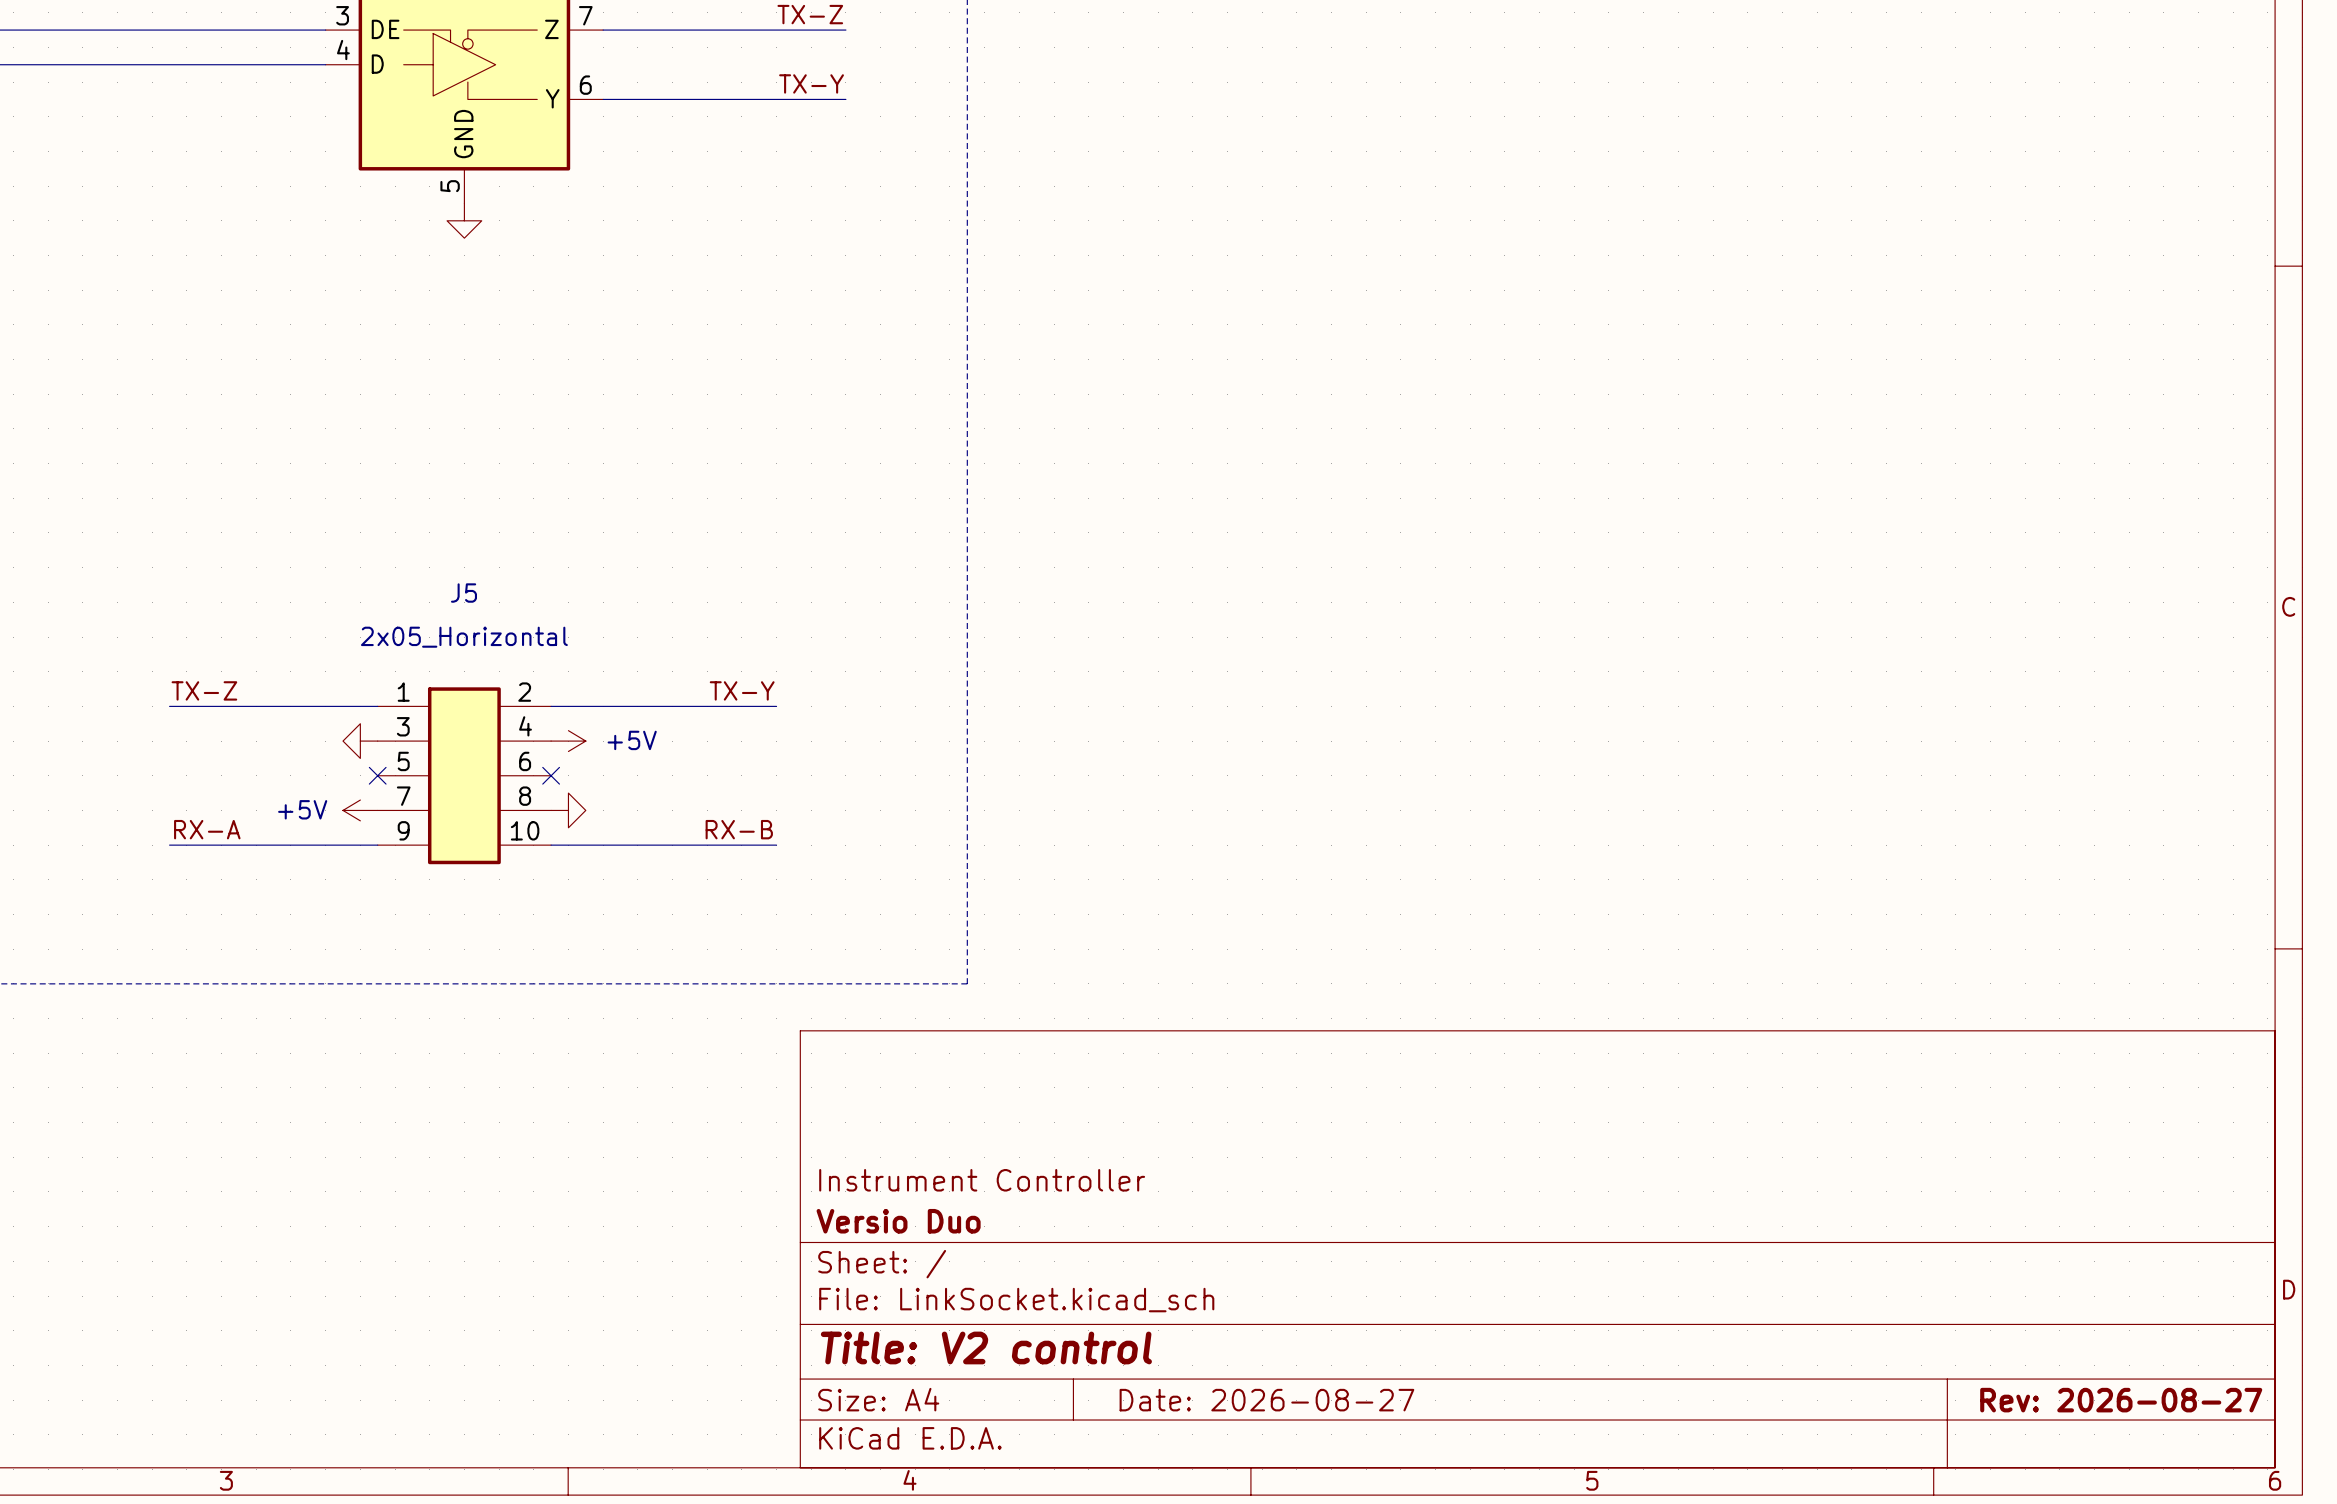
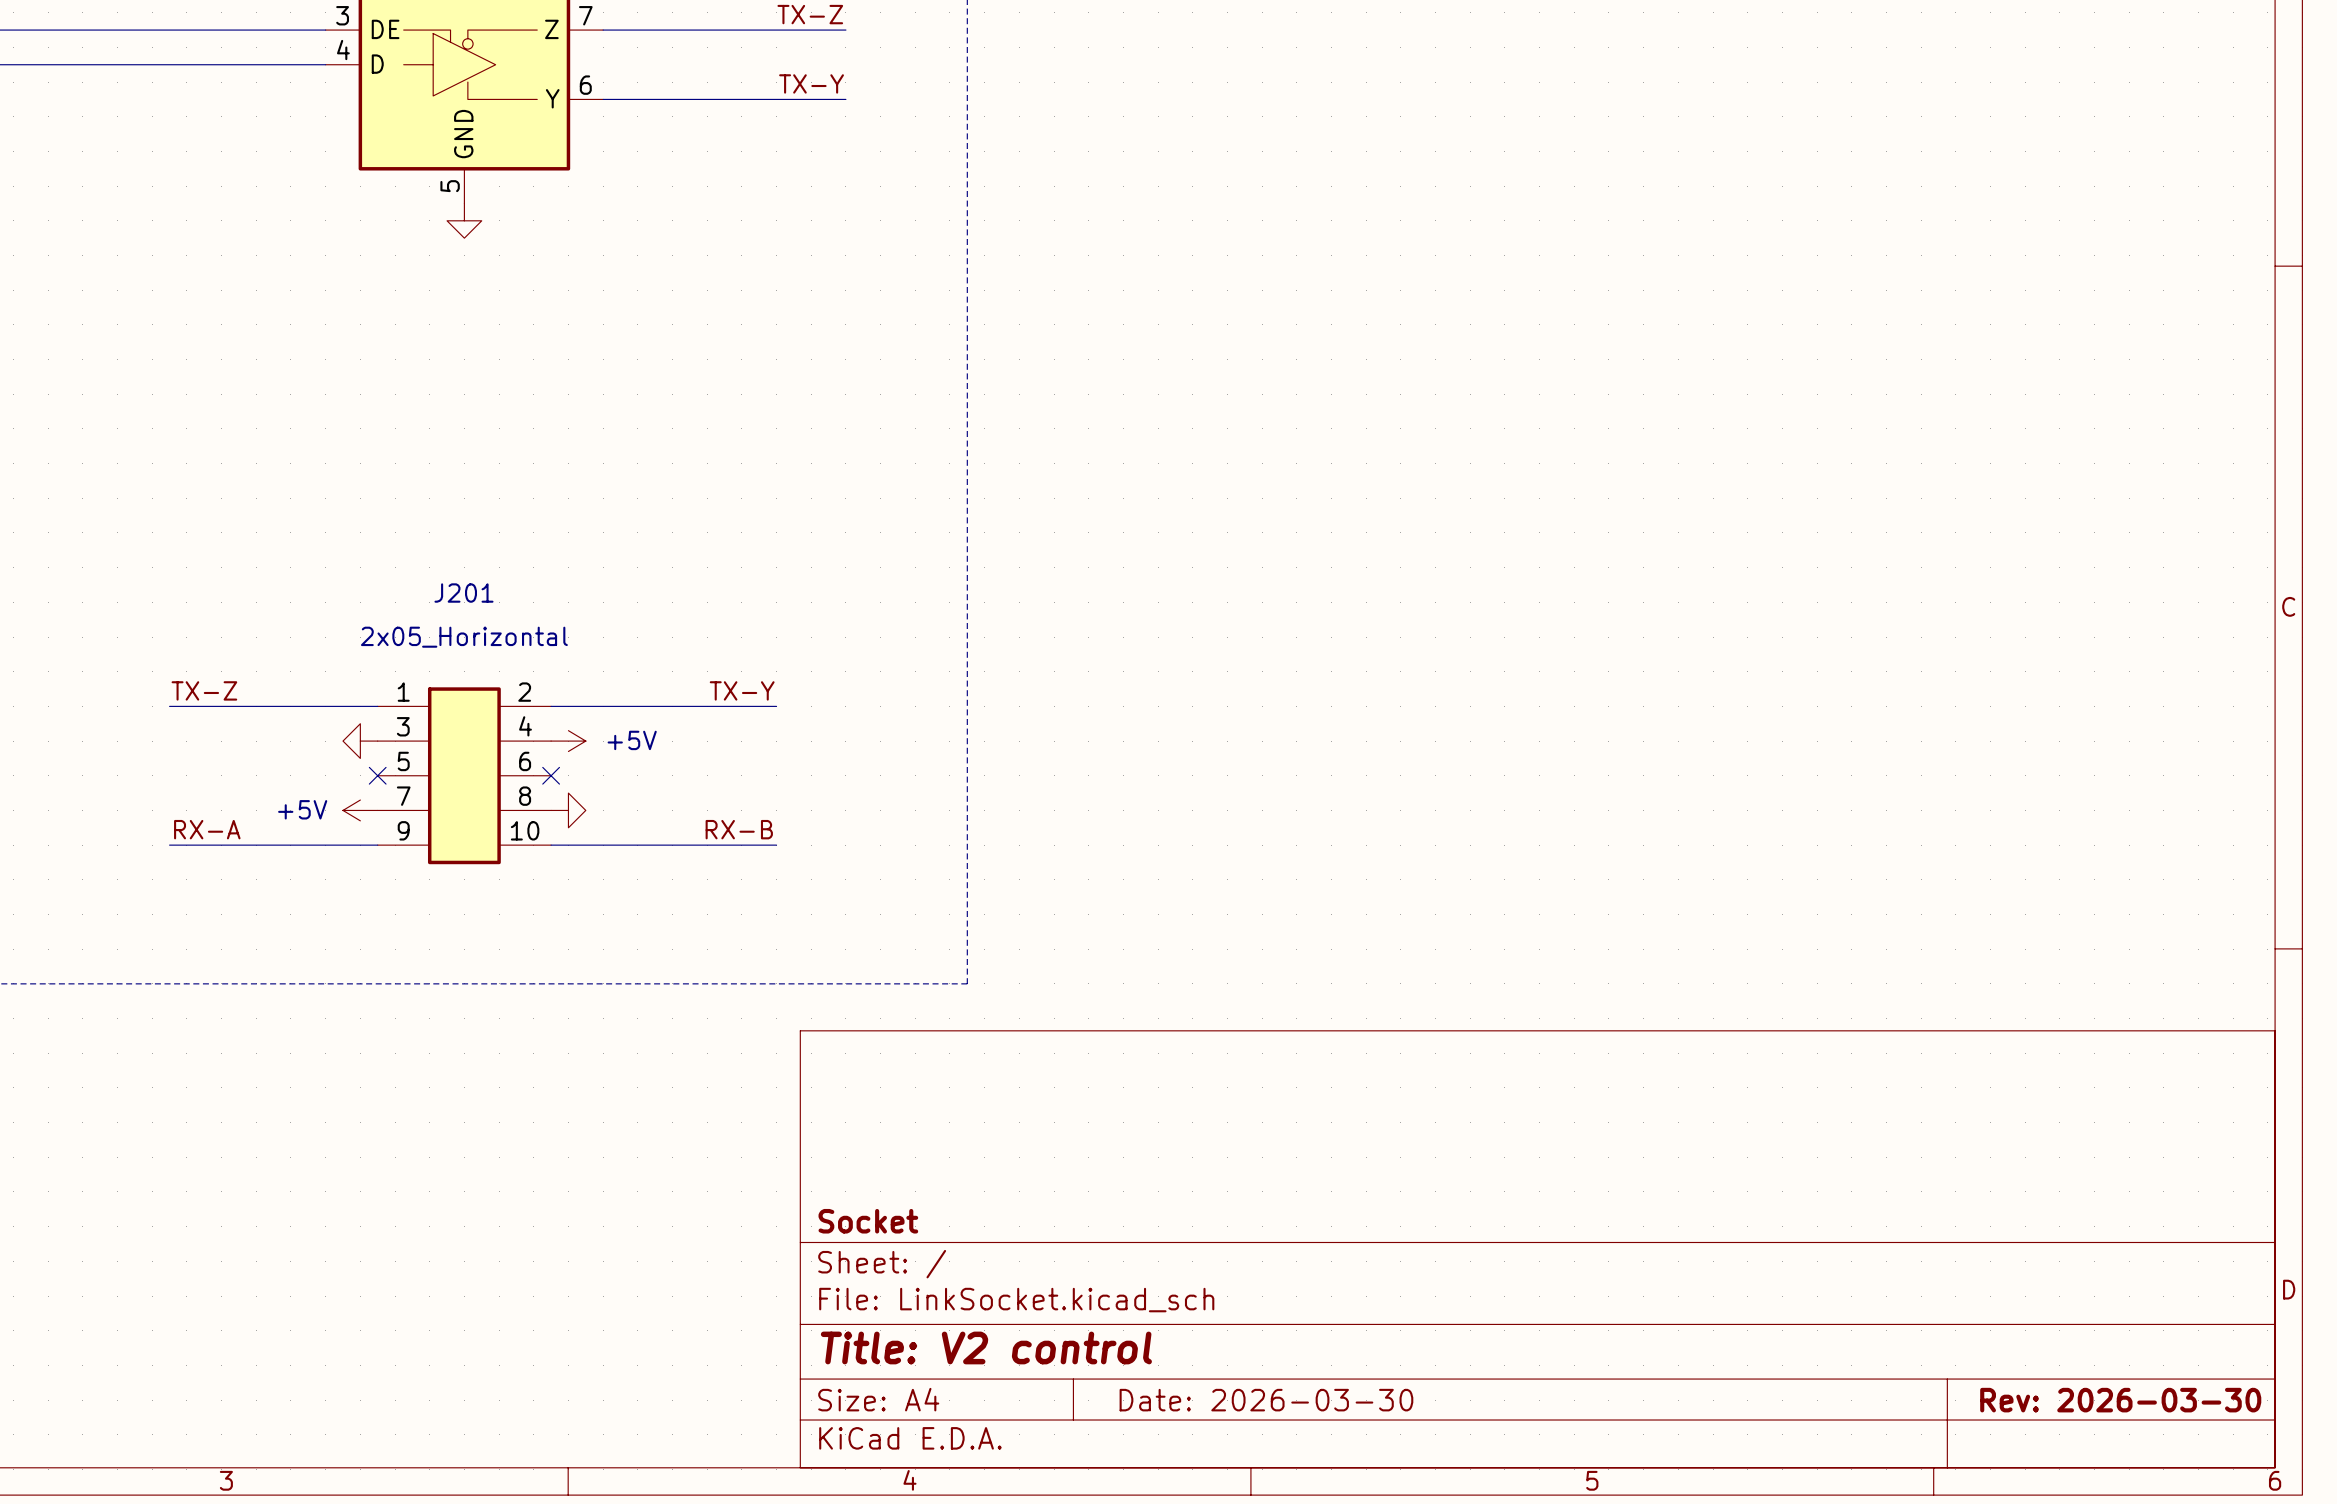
J5 name: J5 (463, 593) -> J201 (463, 593)
title block: Instrument Controller (982, 1180) -> none
title block: Versio Duo (898, 1221) -> Socket (868, 1221)
title block: Date: 2026-08-27 (1266, 1400) -> Date: 2026-03-30 (1266, 1400)
title block: Rev: 2026-08-27 (2121, 1400) -> Rev: 2026-03-30 (2120, 1400)

